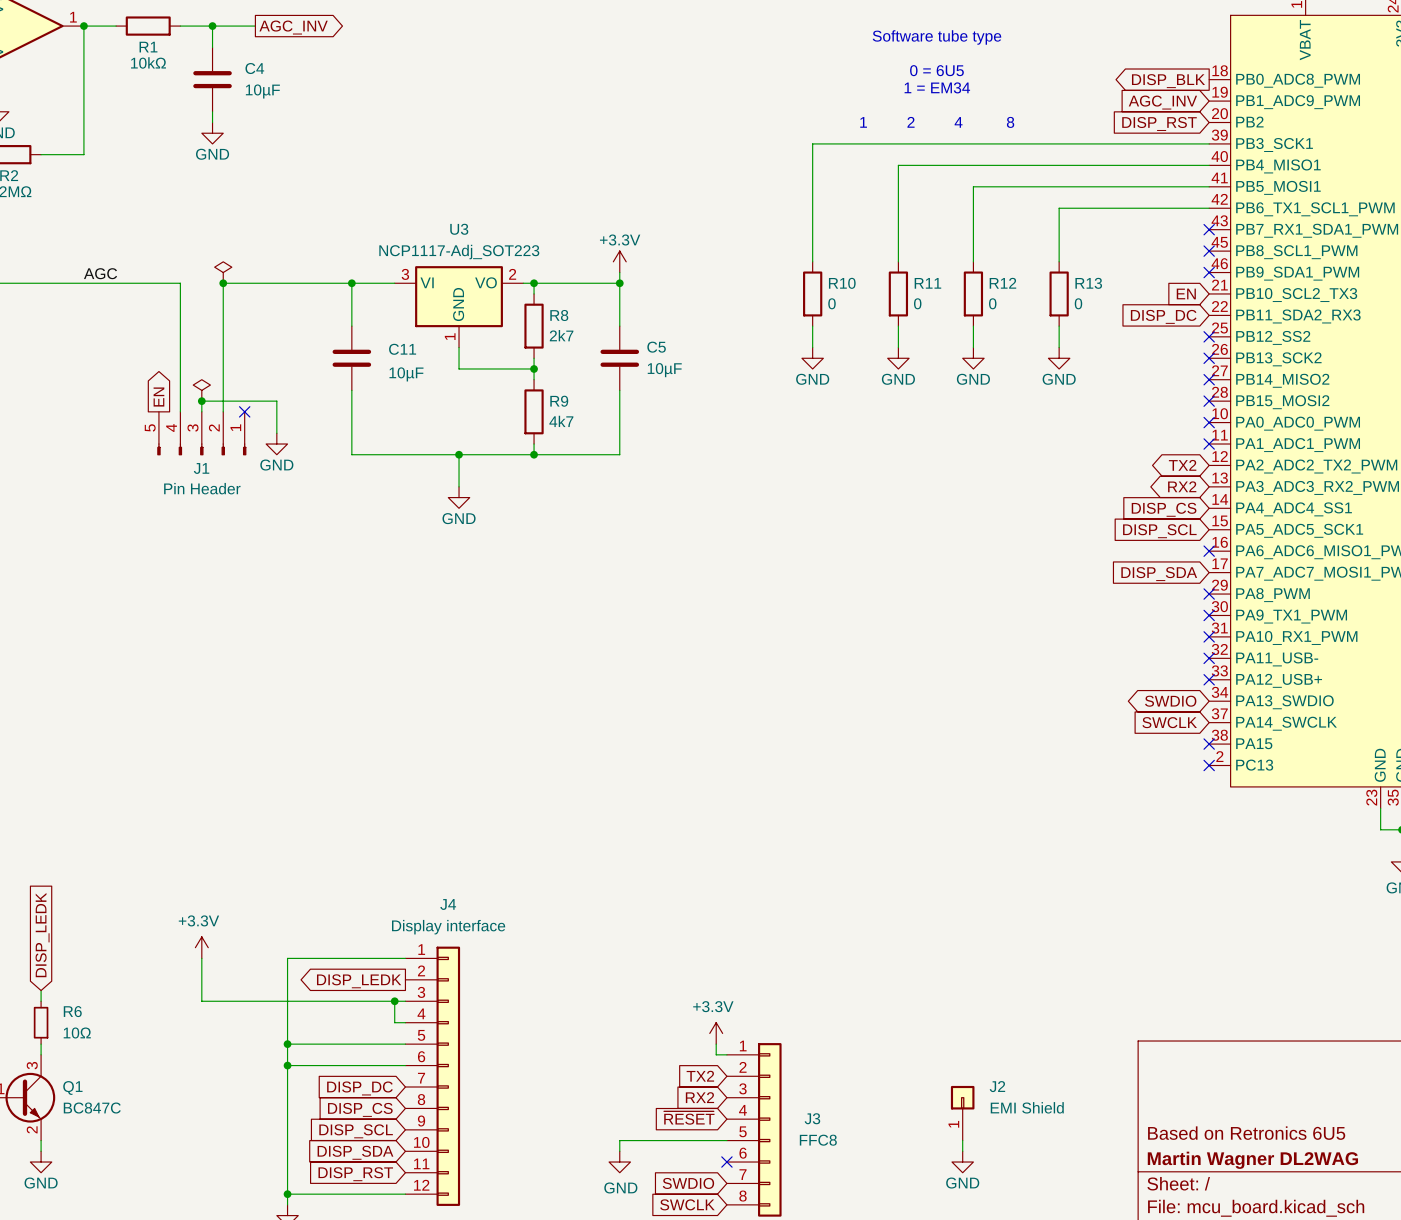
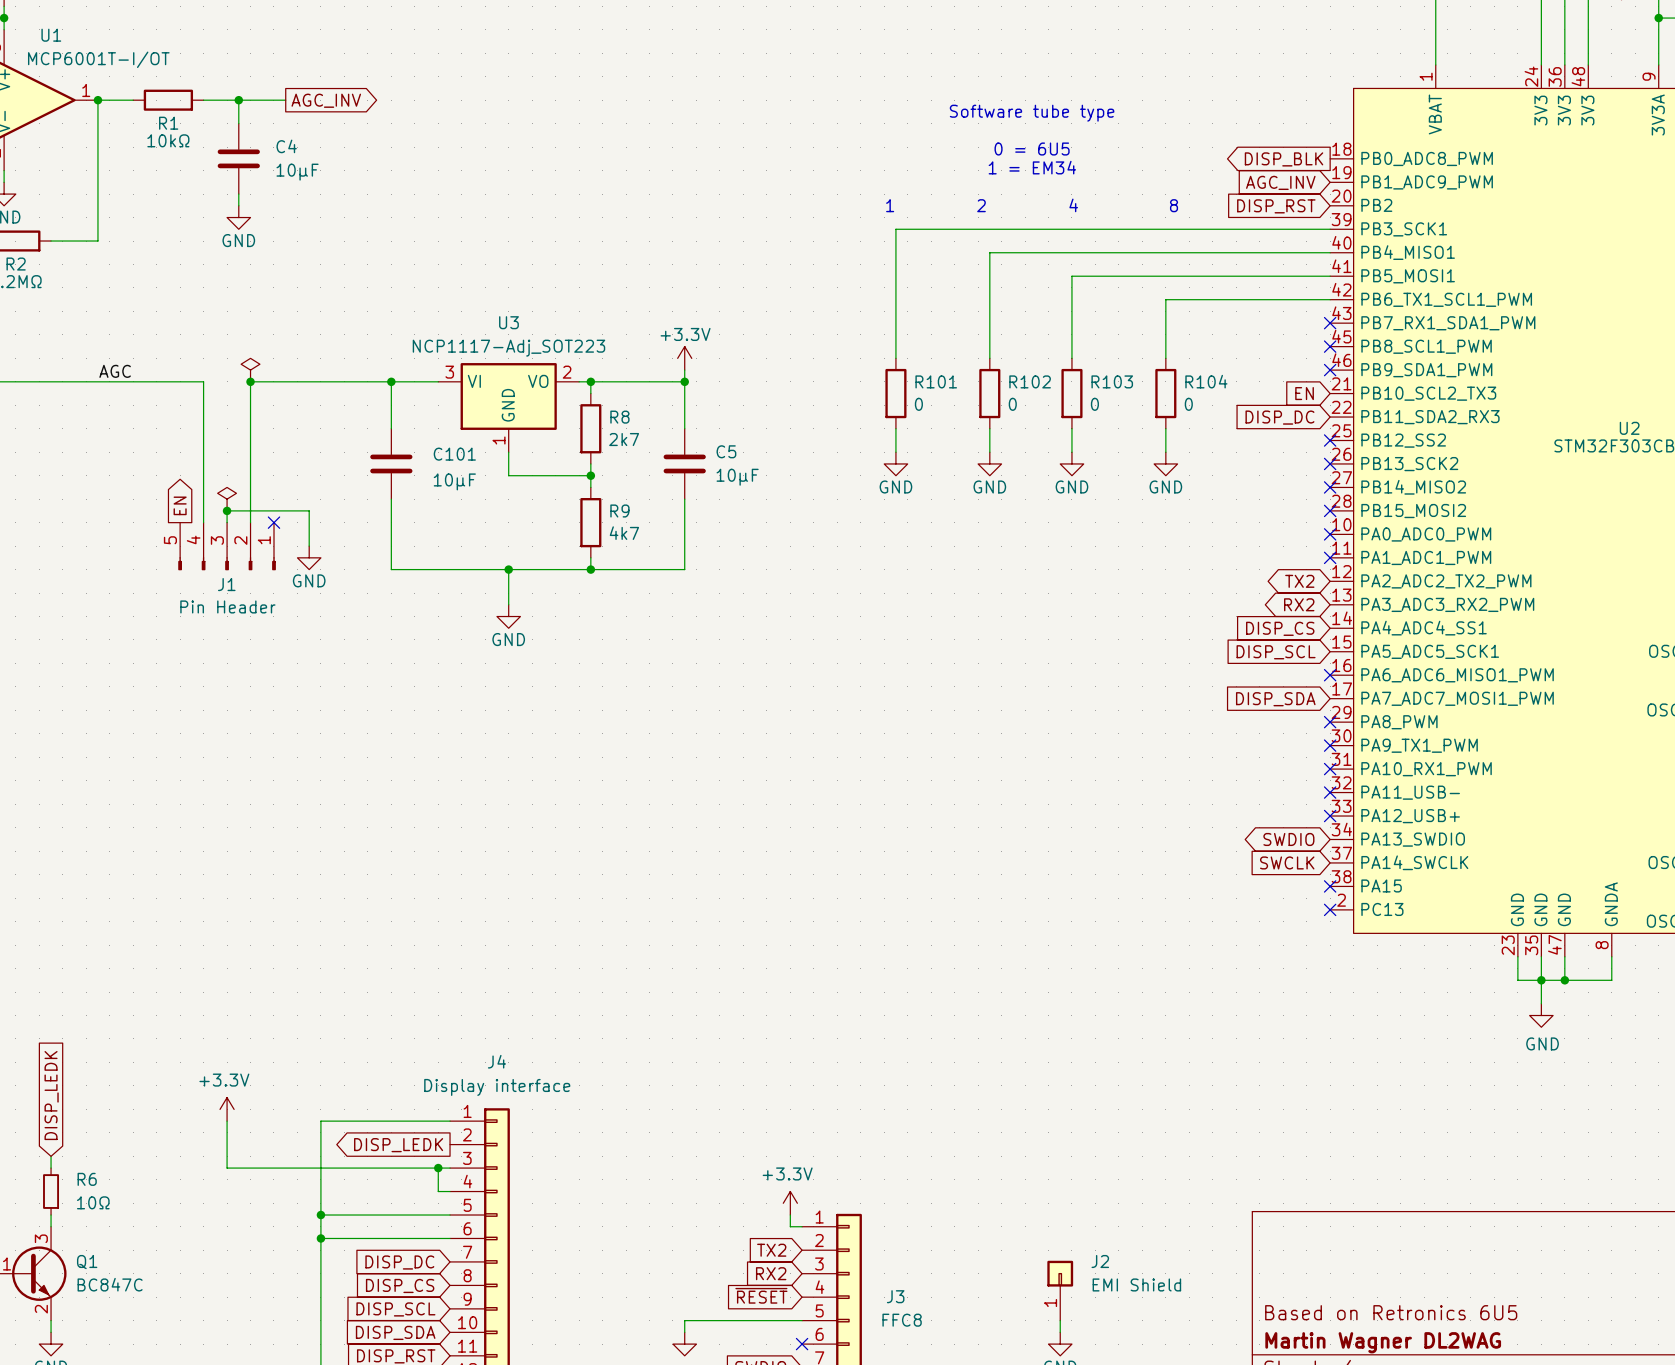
R10 name: R10 (842, 283) -> R101 (936, 381)
R11 name: R11 (927, 283) -> R102 (1030, 381)
R12 name: R12 (1002, 283) -> R103 (1112, 381)
R13 name: R13 (1088, 283) -> R104 (1206, 381)
C11 name: C11 (402, 349) -> C101 (454, 454)

